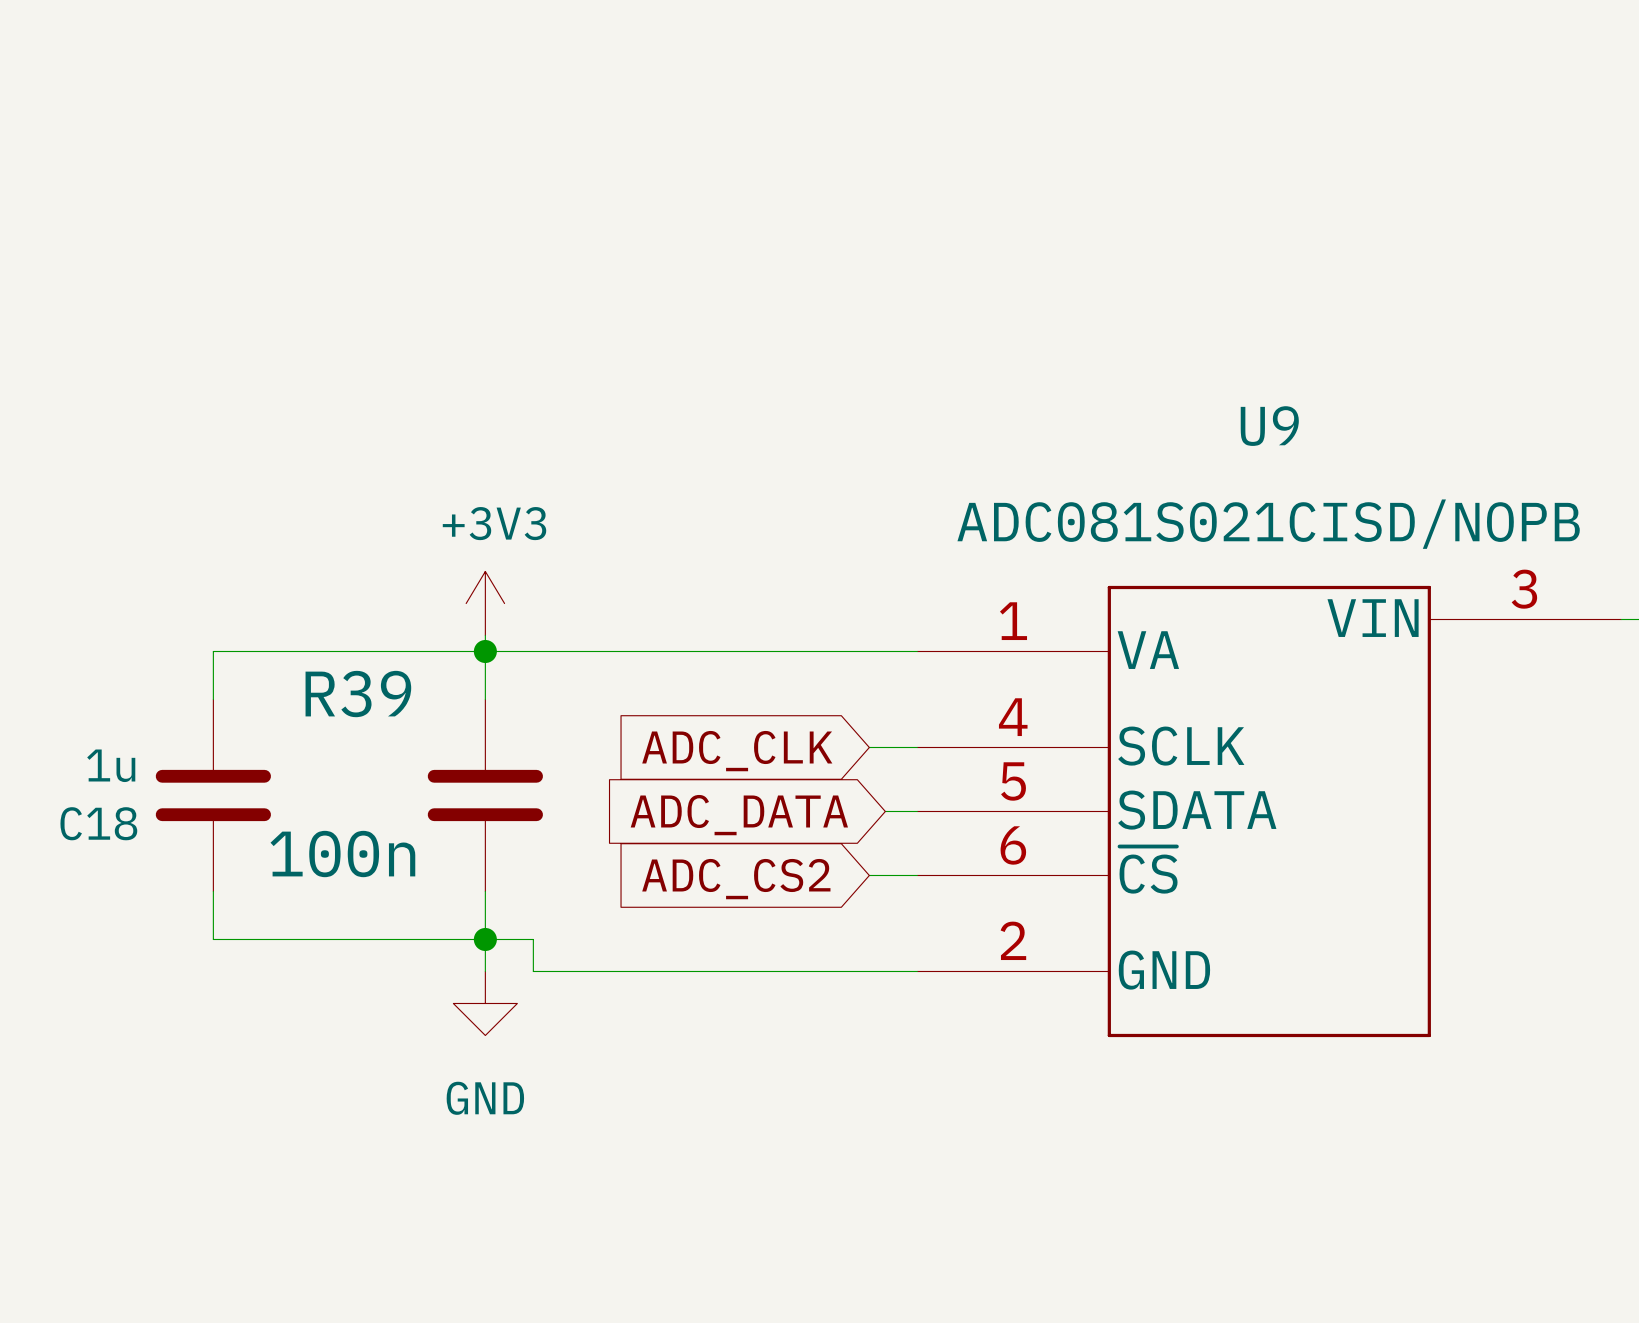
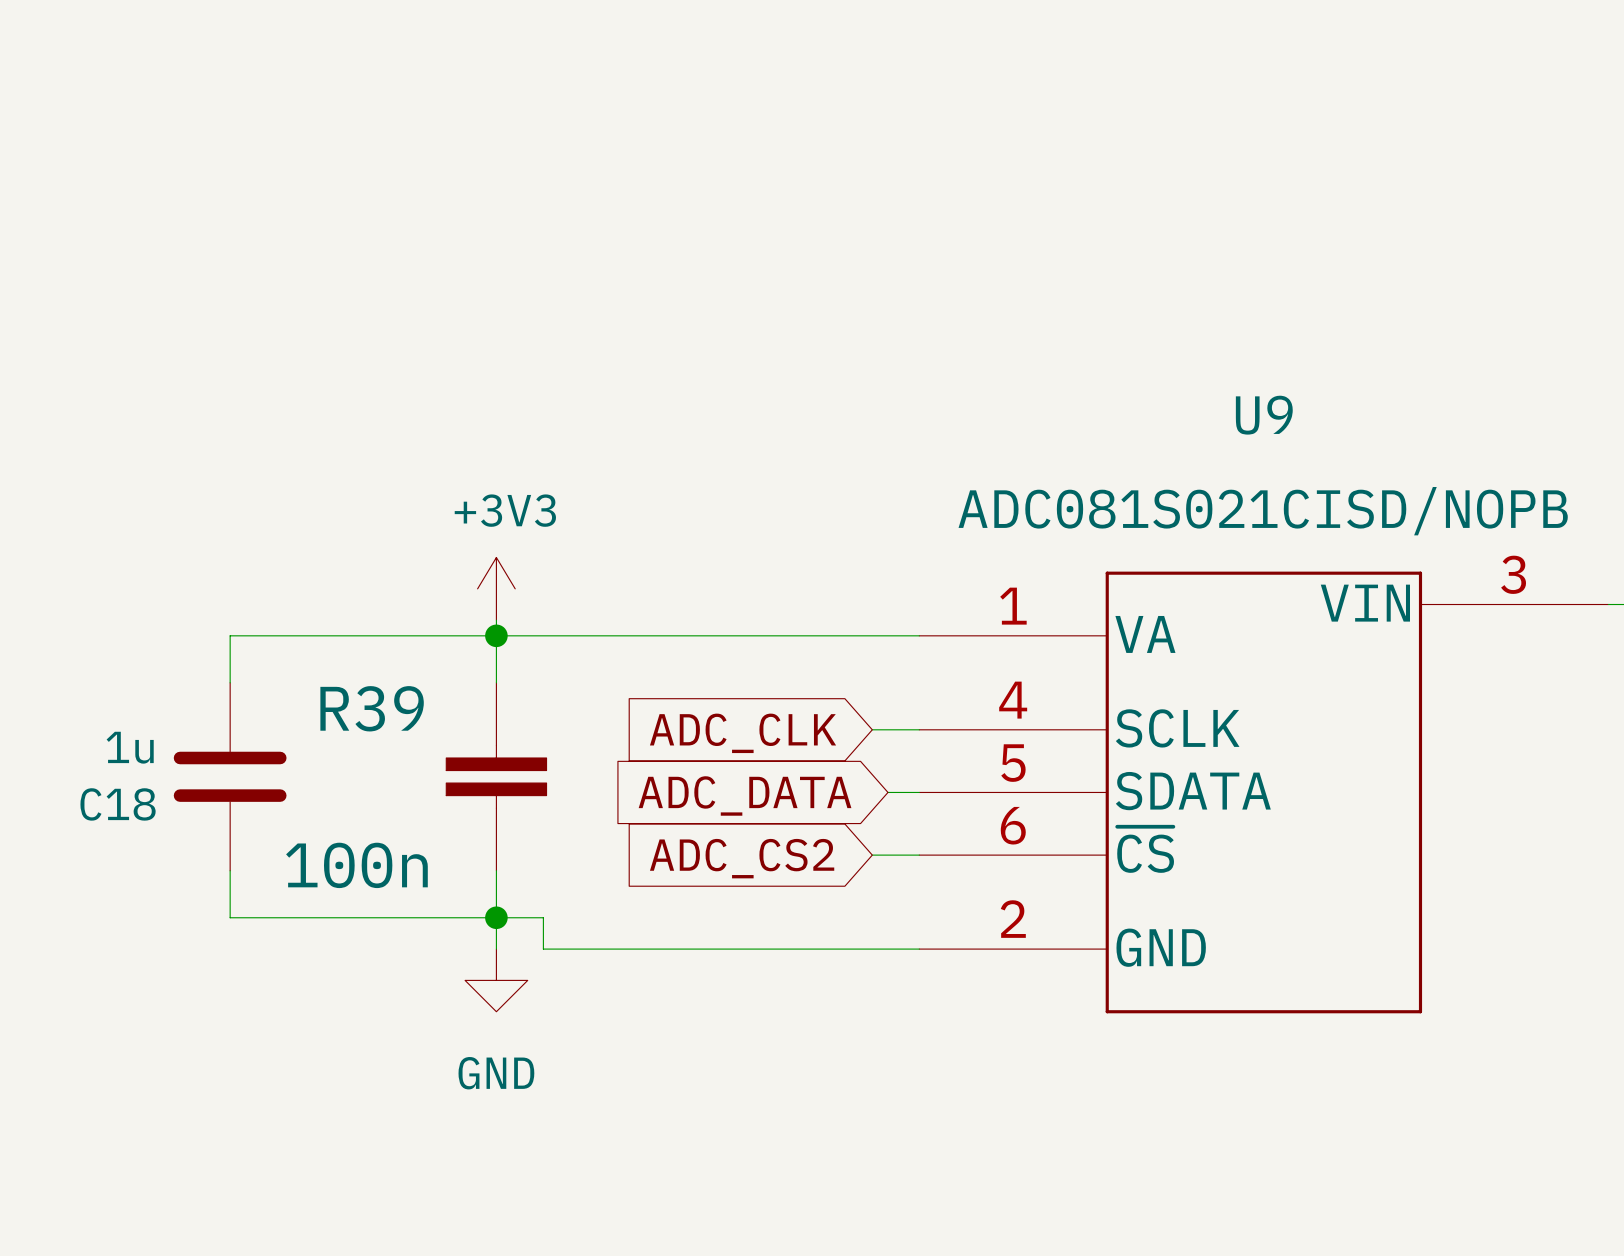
R39 name position: R39 (358, 694) -> R39 (372, 708)
R39 symbol: [427, 699, 543, 892] -> [446, 682, 547, 871]
R39 value position: 100n (342, 854) -> 100n (356, 865)

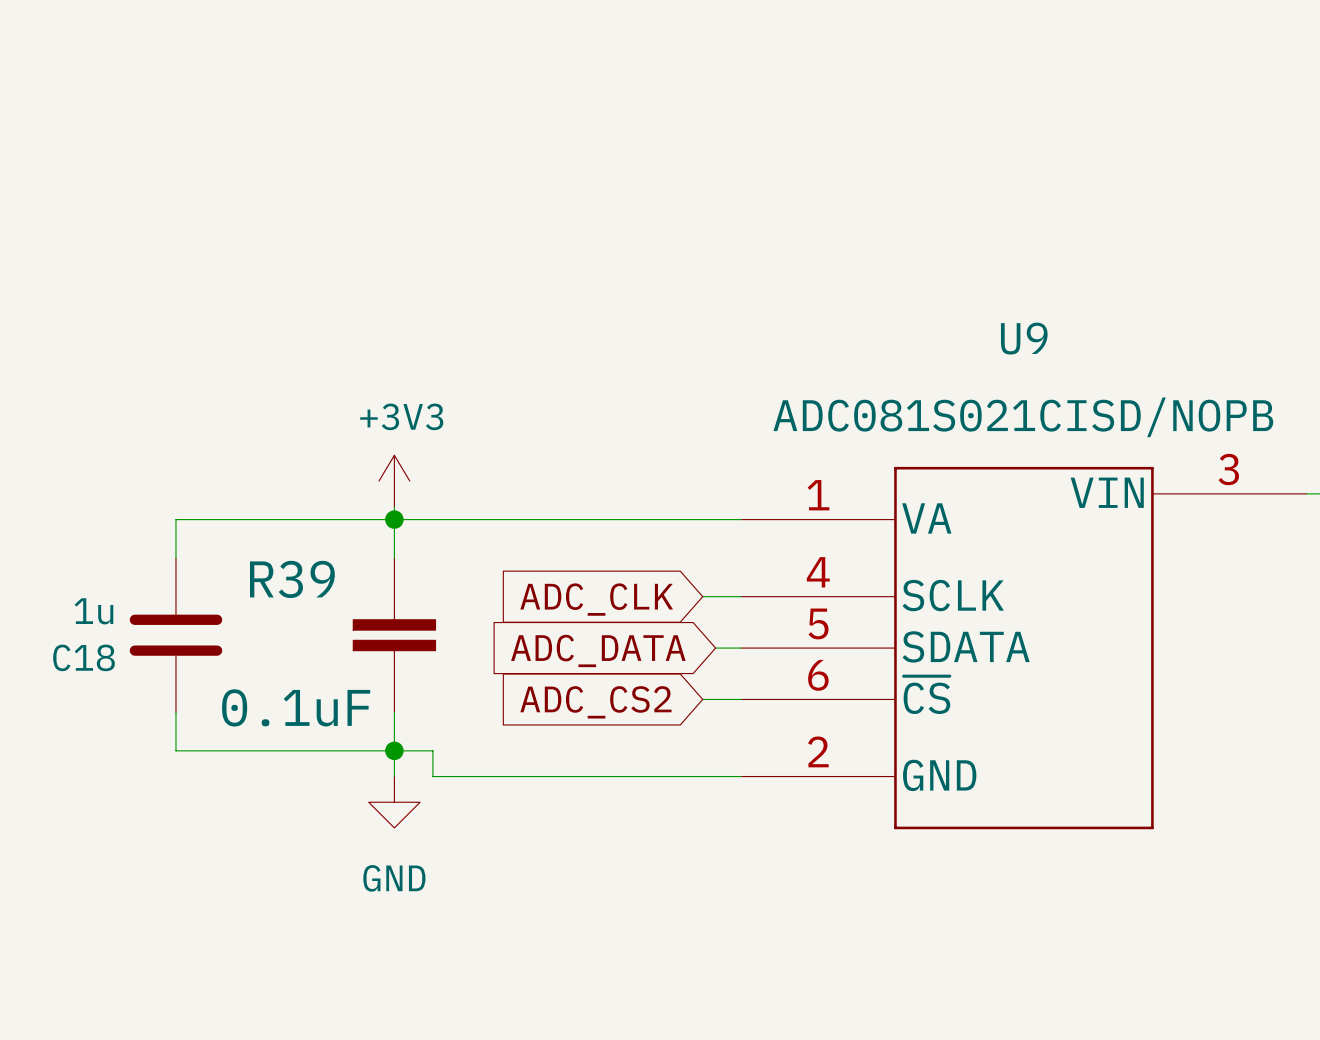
R39 value: 100n (356, 865) -> 0.1uF (296, 707)

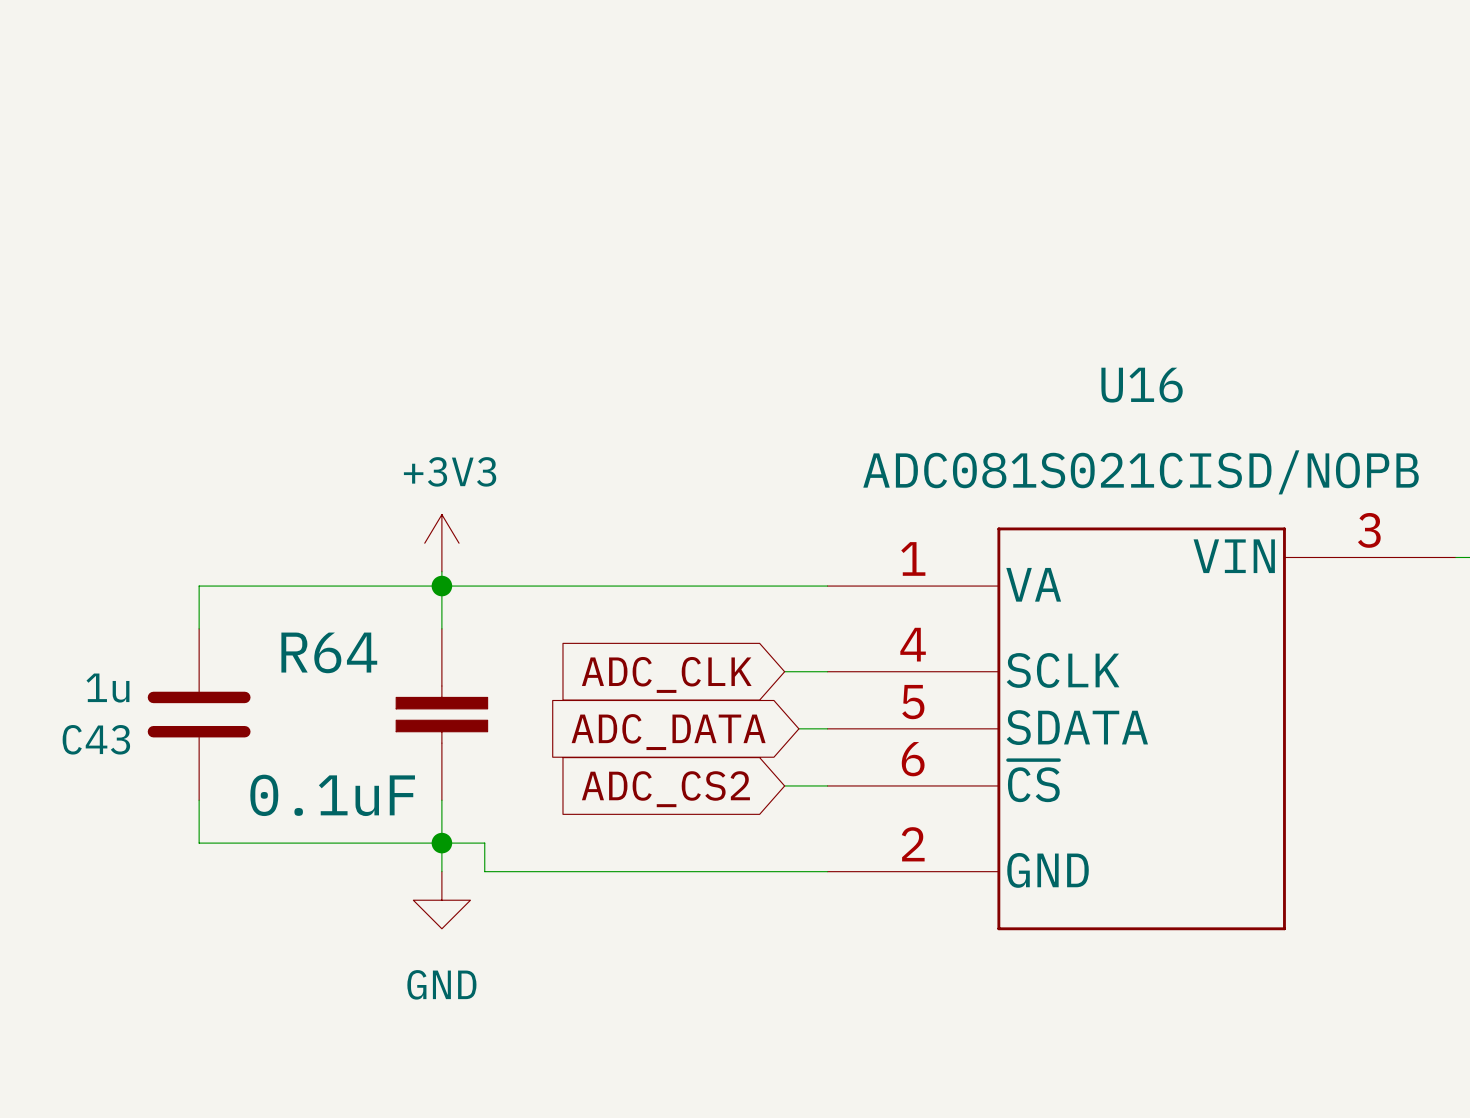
U9 name: U9 (1024, 338) -> U16 (1142, 385)
R39 name: R39 (292, 579) -> R64 (329, 652)
C18 name: C18 (84, 657) -> C43 (96, 739)

